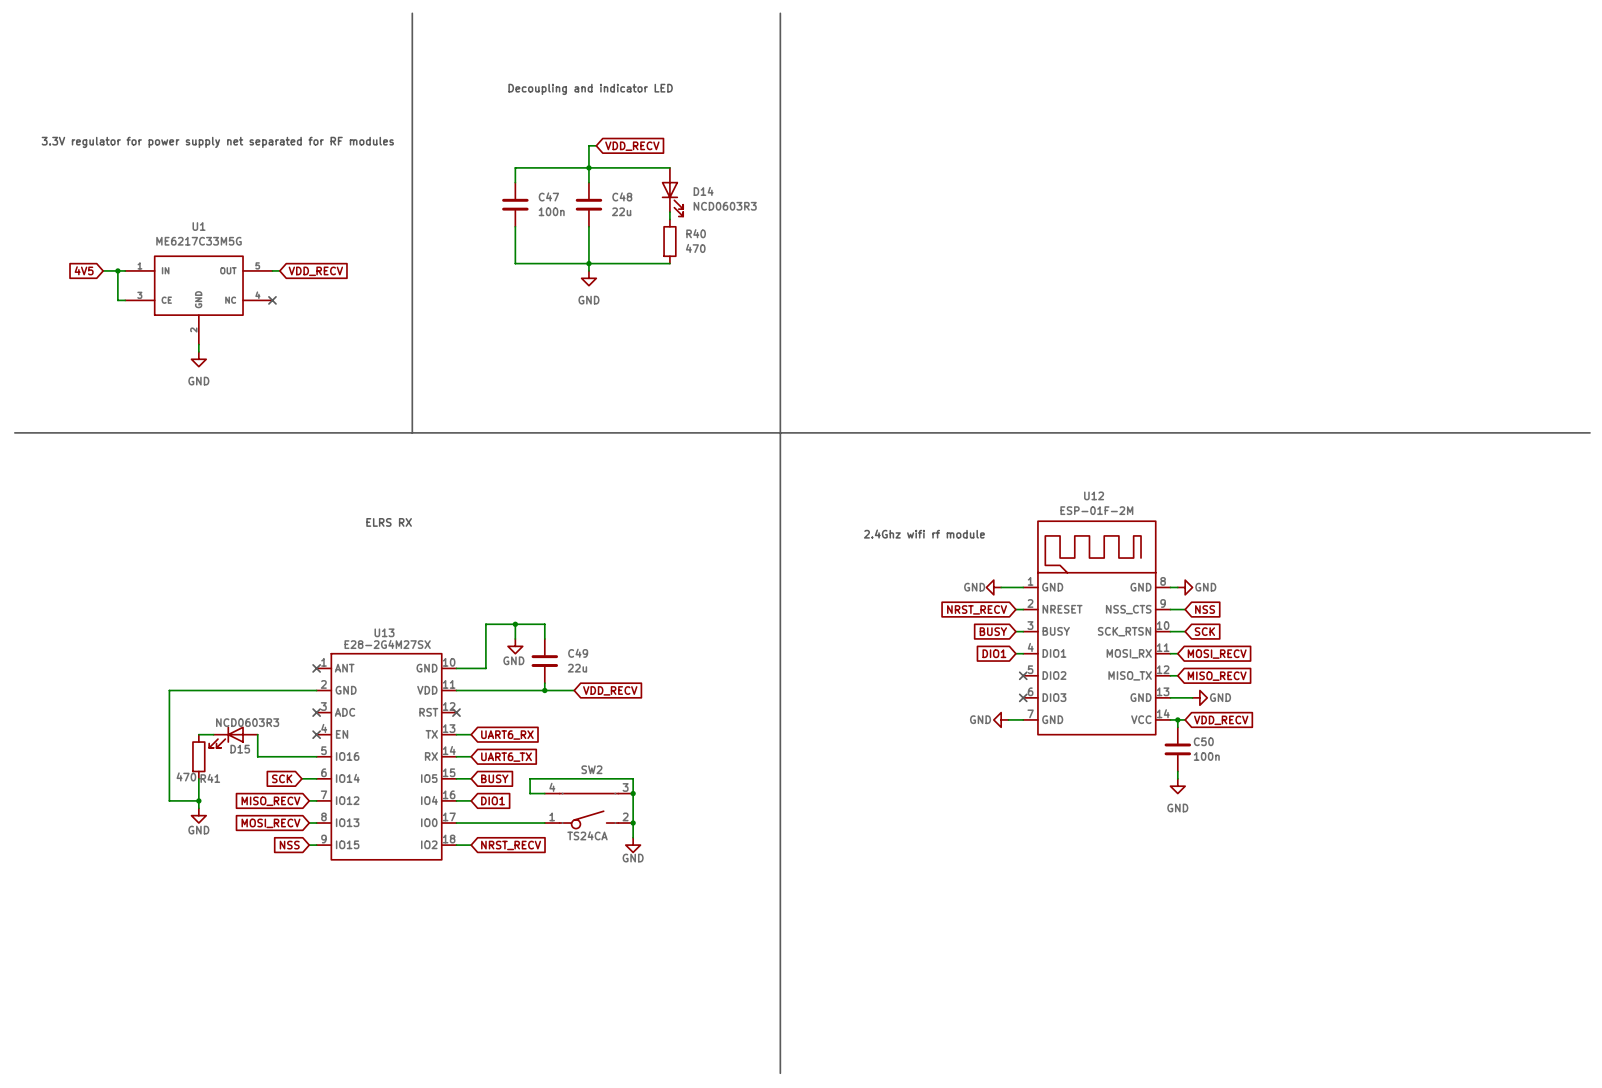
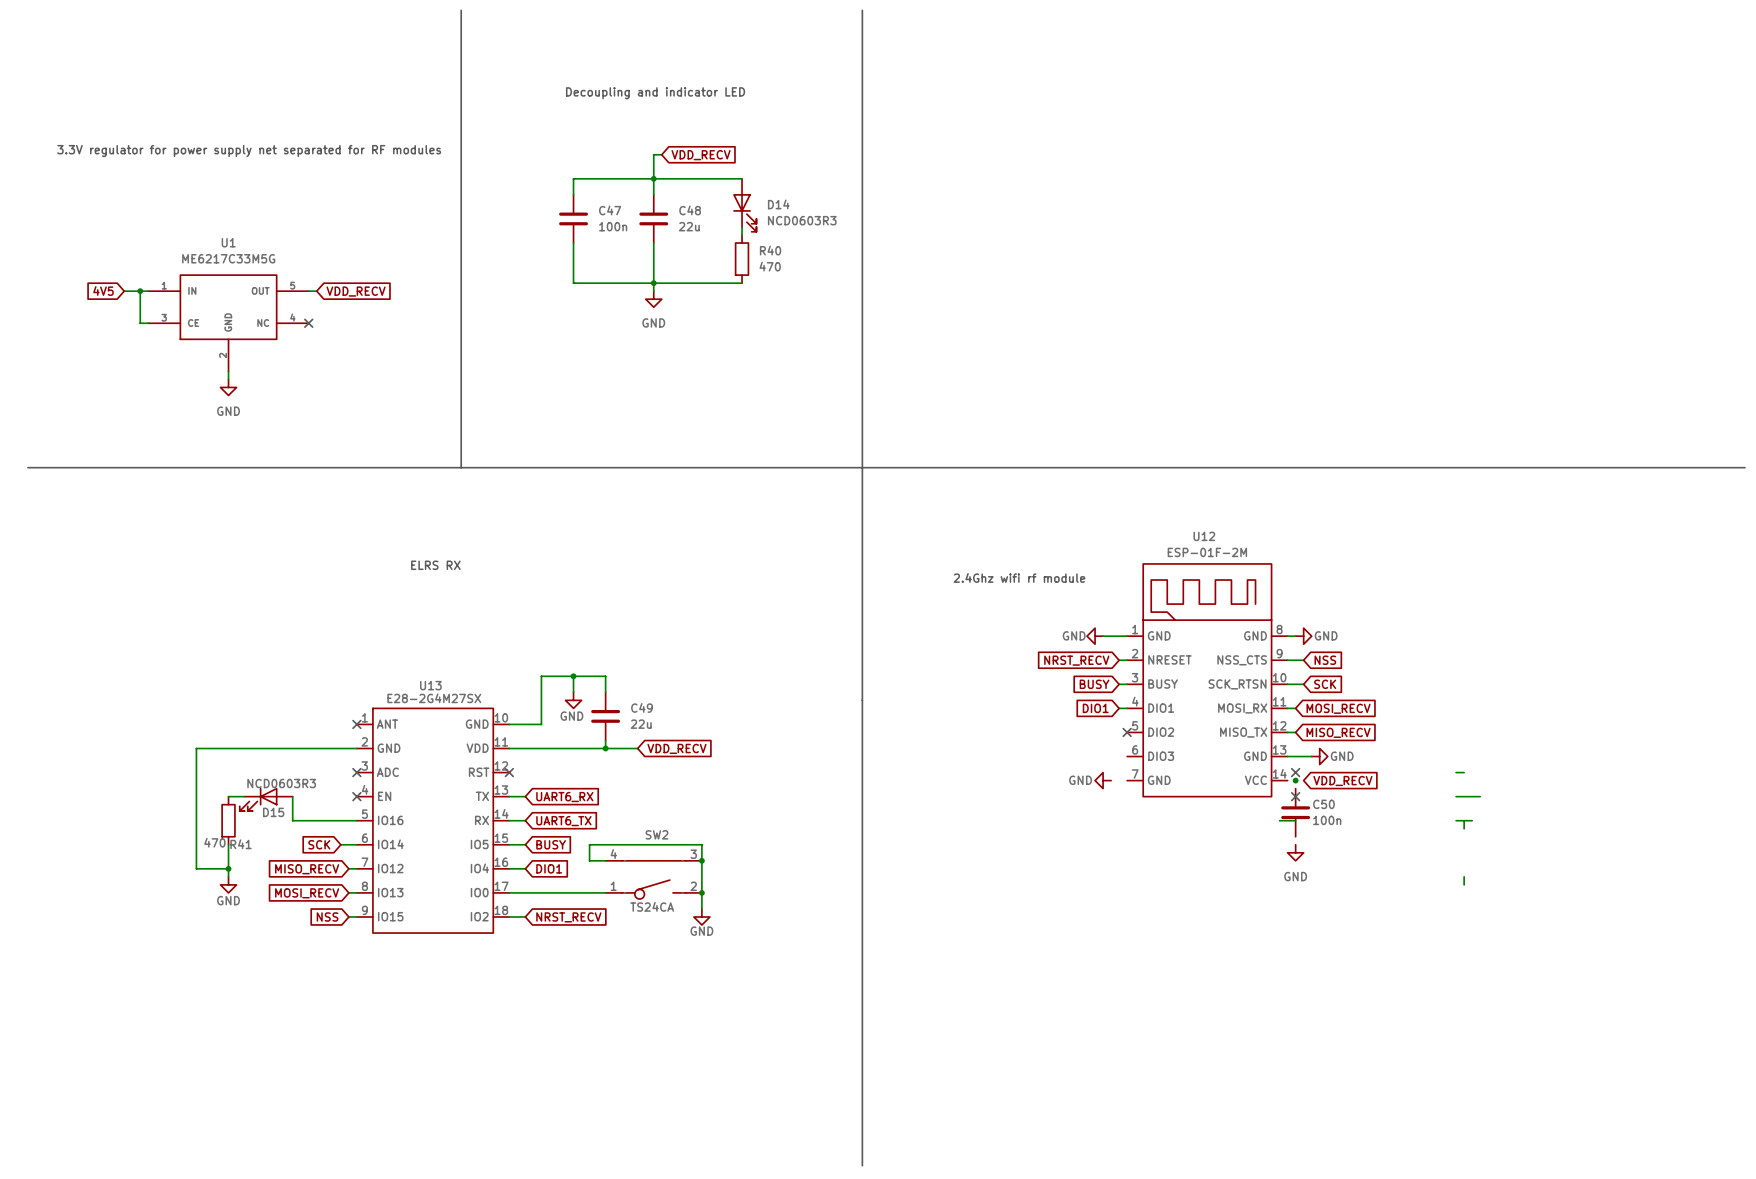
no-connect mark: (1023, 697) -> none
no-connect mark: none -> (1295, 772)
wire: none -> (1456, 772) (1464, 772)
wire: (1008, 719) (1023, 719) -> none
wire: (1170, 719) (1185, 719) -> (1279, 820) (1295, 820)
wire: (1177, 719) (1177, 727) -> none
no-connect mark: none -> (1295, 796)
wire: none -> (1456, 796) (1480, 796)
wire: none -> (1456, 820) (1472, 820)
wire: none -> (1464, 820) (1464, 828)
wire: (1177, 771) (1177, 778) -> none
wire: none -> (1464, 876) (1464, 884)

